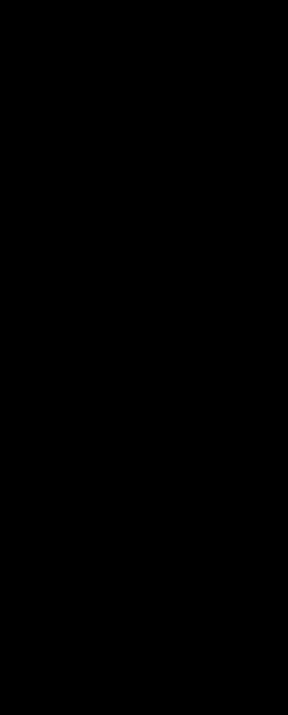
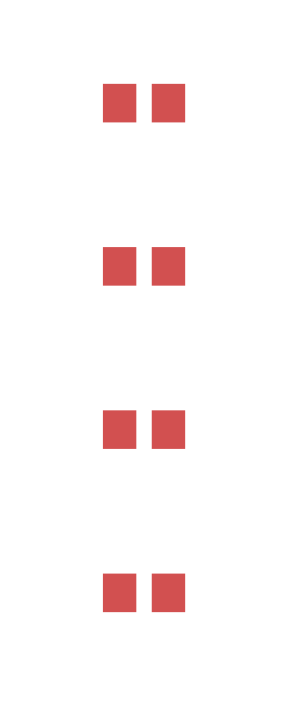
part: none -> (144, 103)
part: none -> (144, 266)
part: none -> (144, 429)
part: none -> (144, 592)

